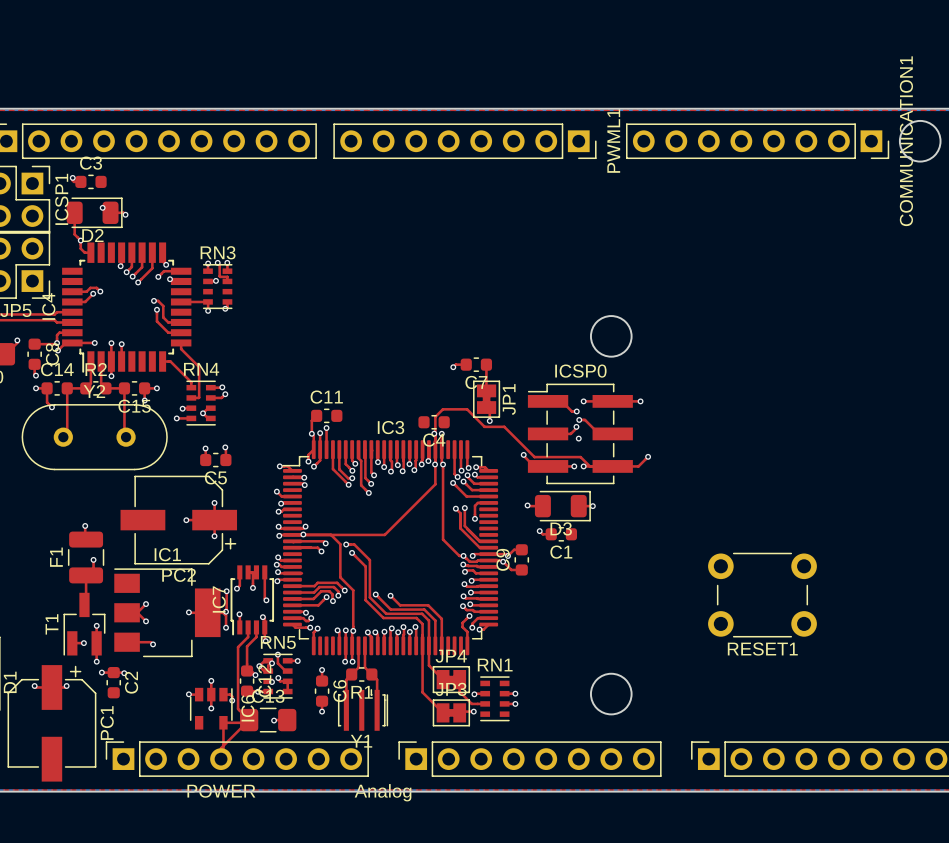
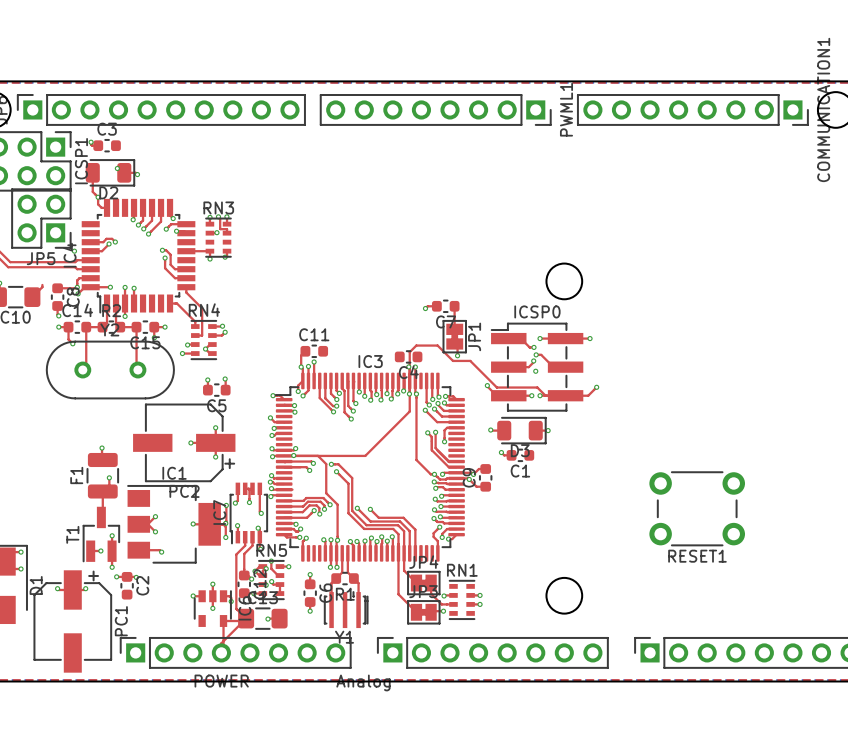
via position: (17, 340) -> (74, 251)

